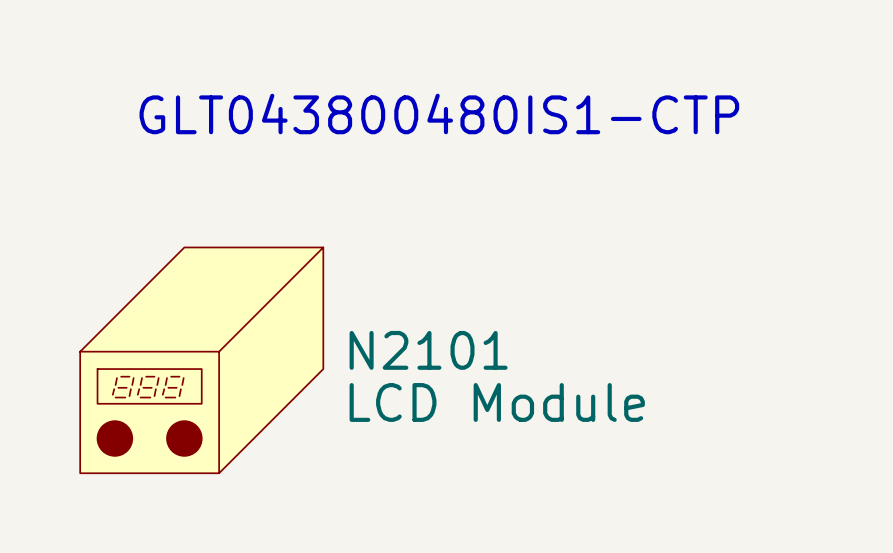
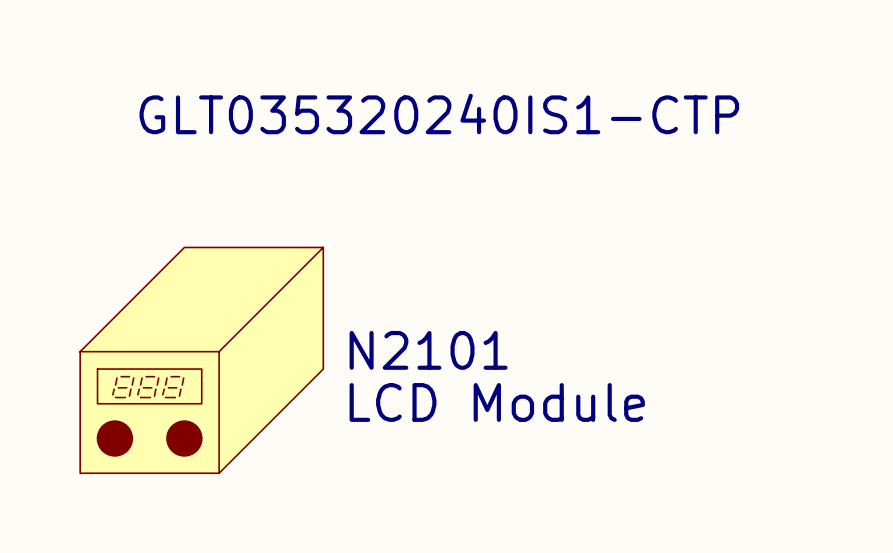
text: GLT043800480IS1-CTP (439, 113) -> GLT035320240IS1-CTP (439, 113)

